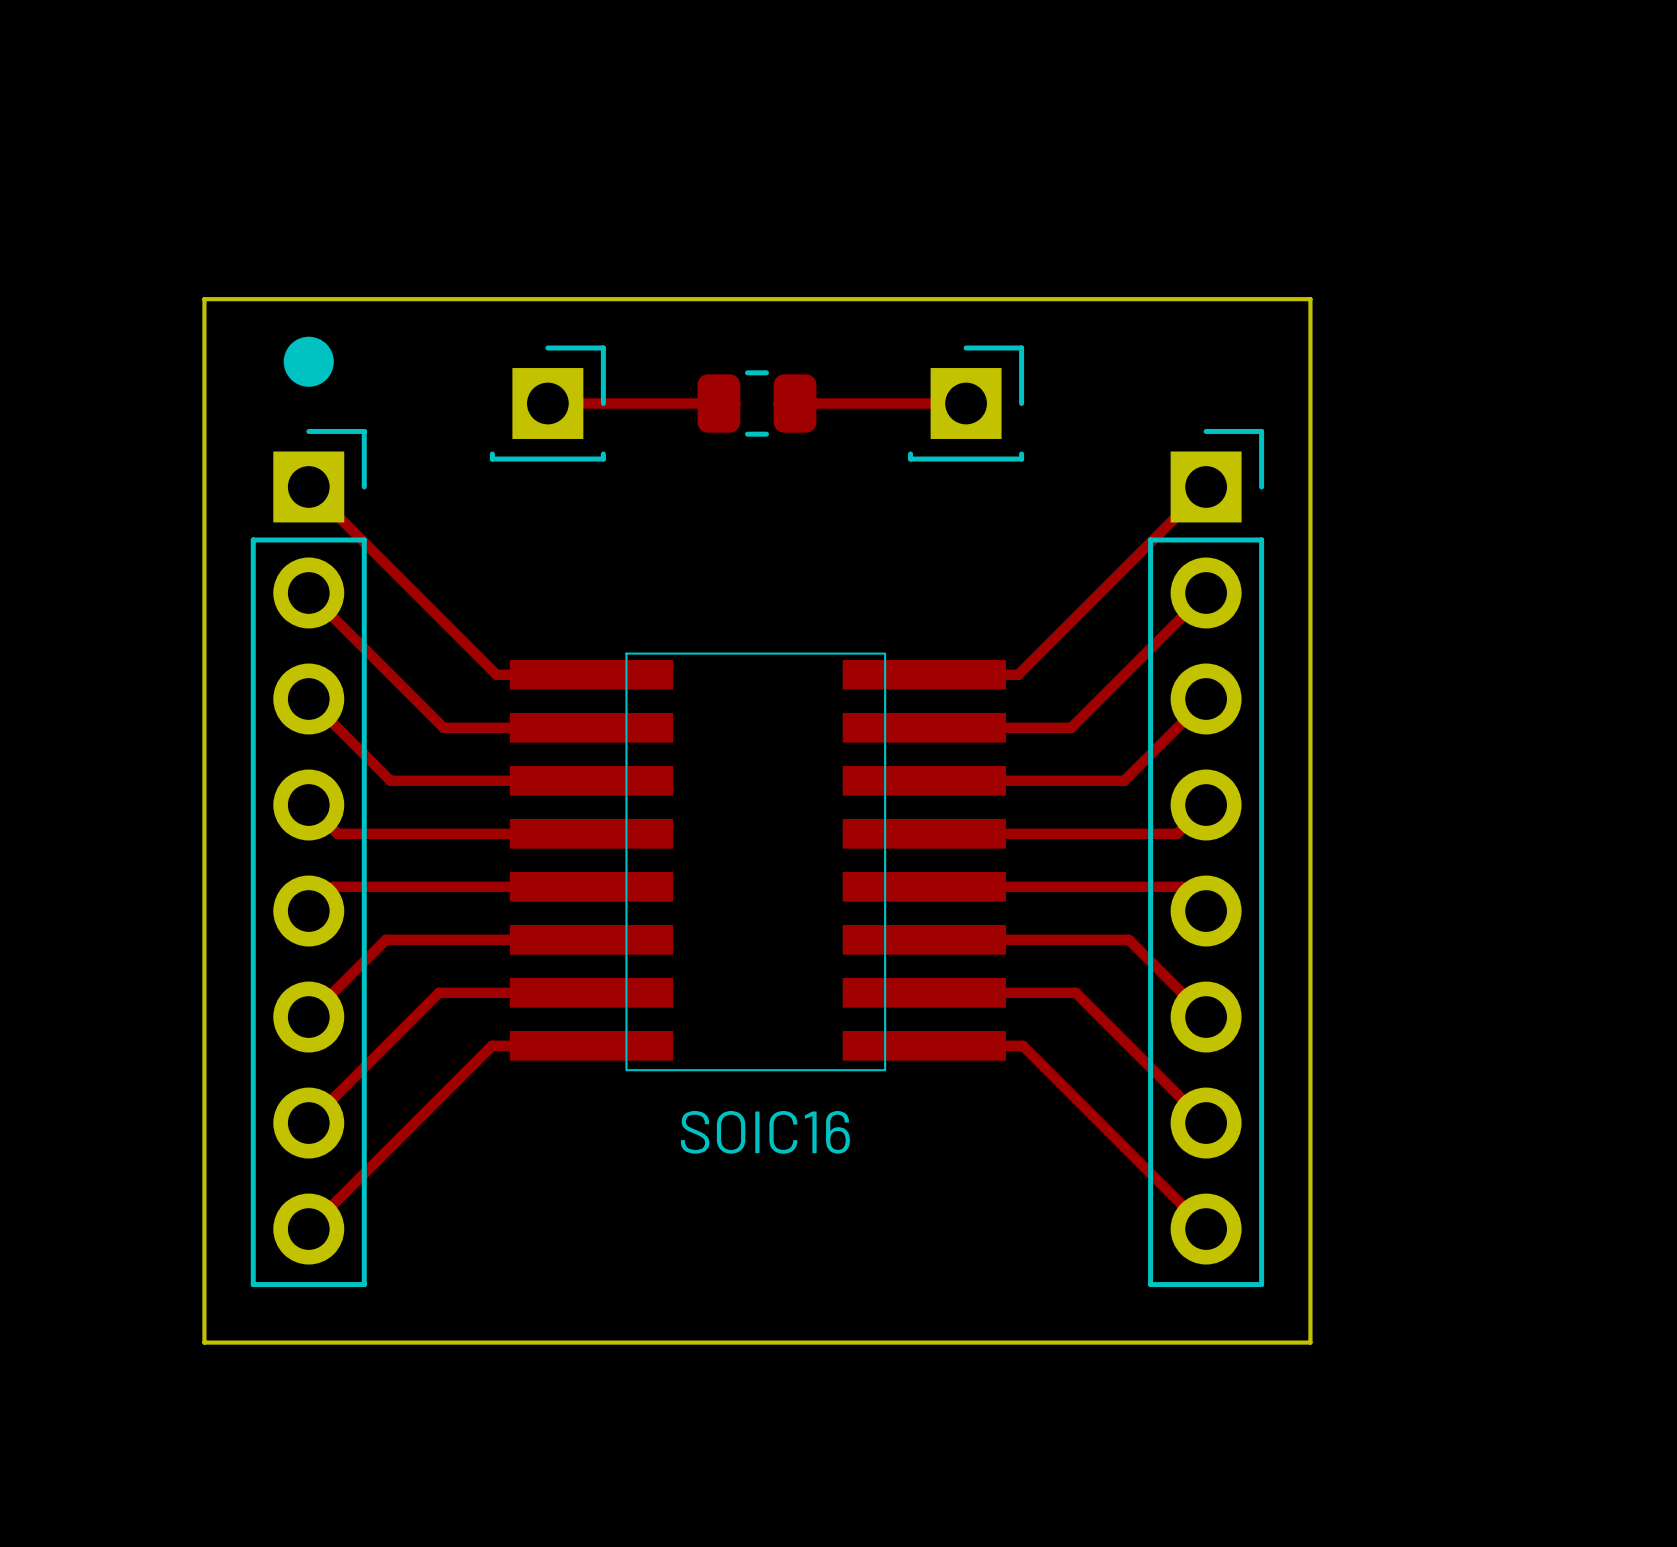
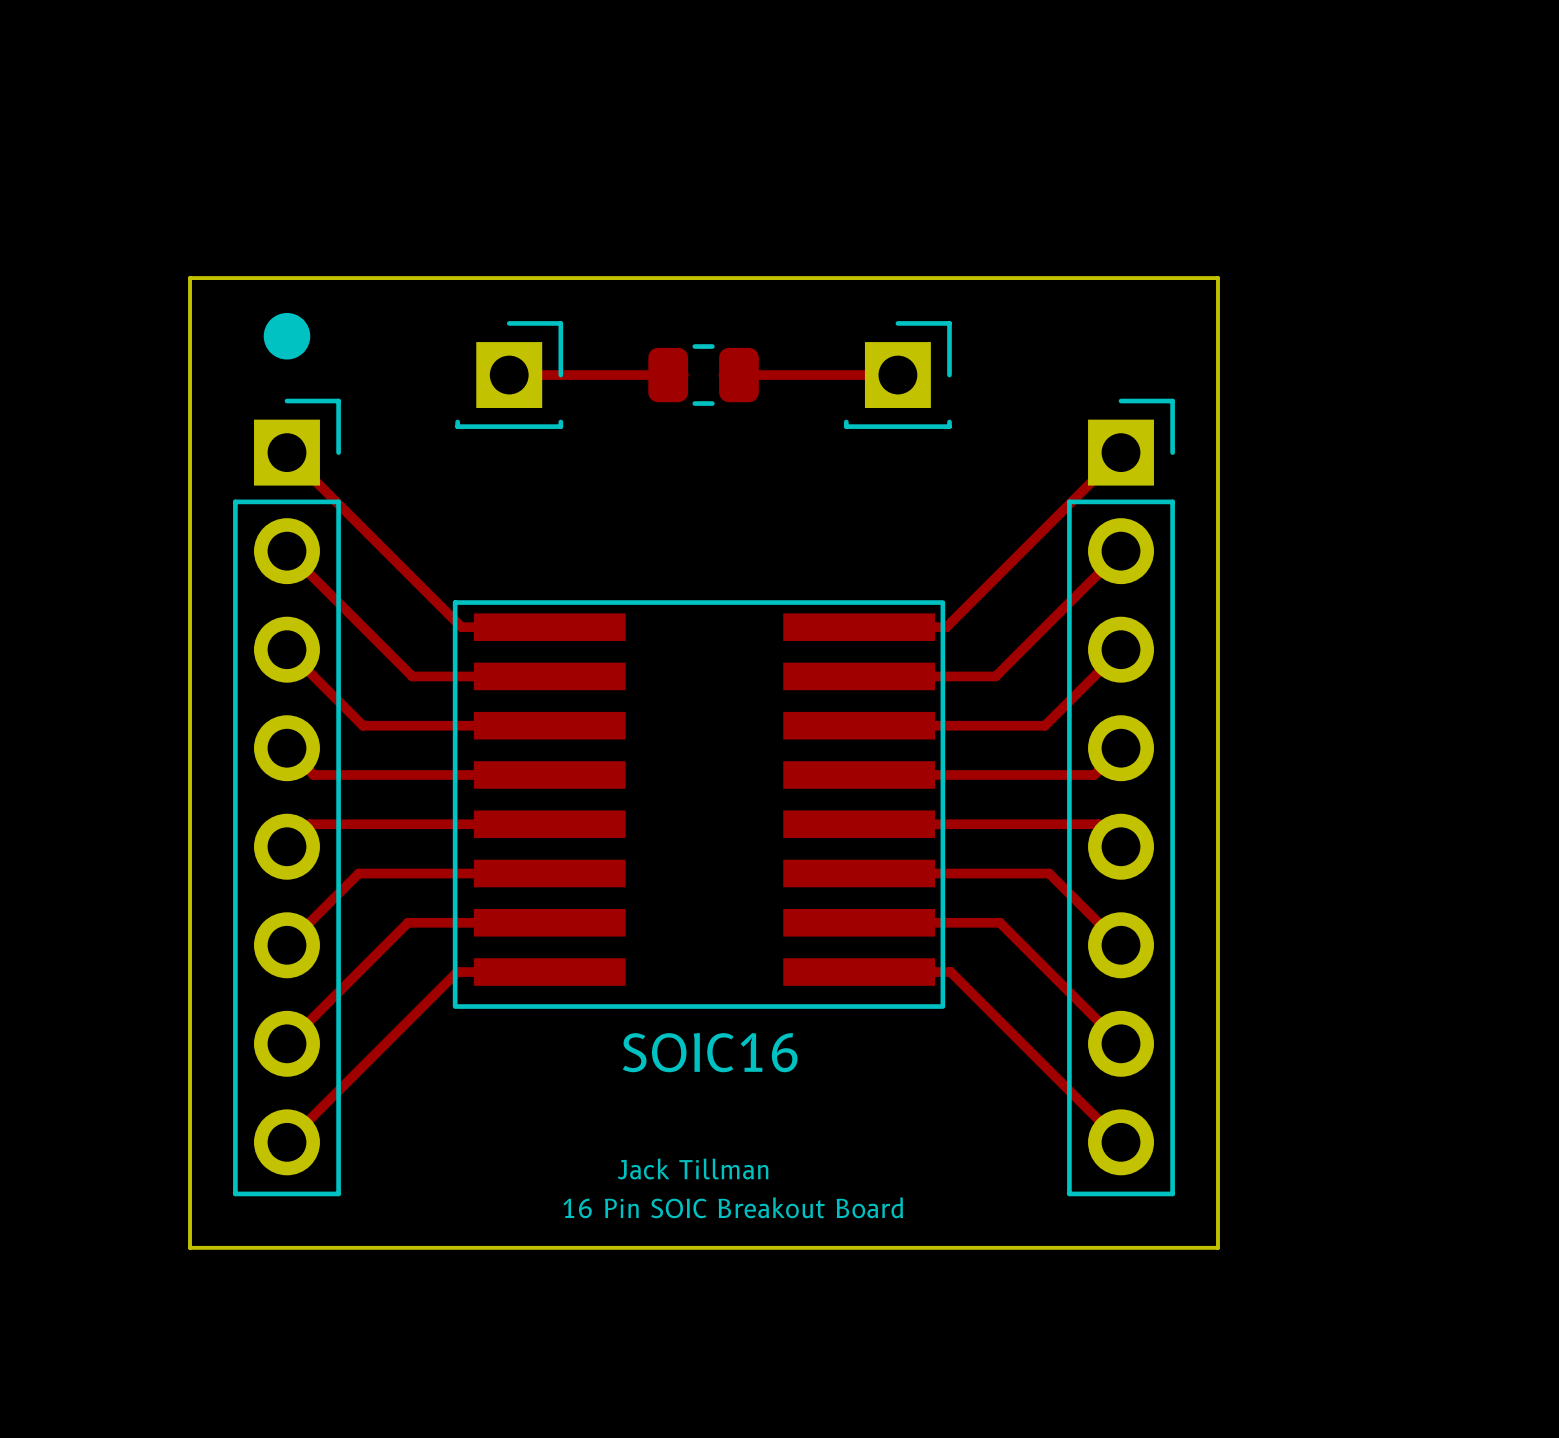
SOIC16 footprint: [509, 652, 1006, 1072] -> [452, 600, 946, 1009]
text: none -> Jack Tillman (693, 1169)
text: none -> 16 Pin SOIC Breakout Board (733, 1207)

